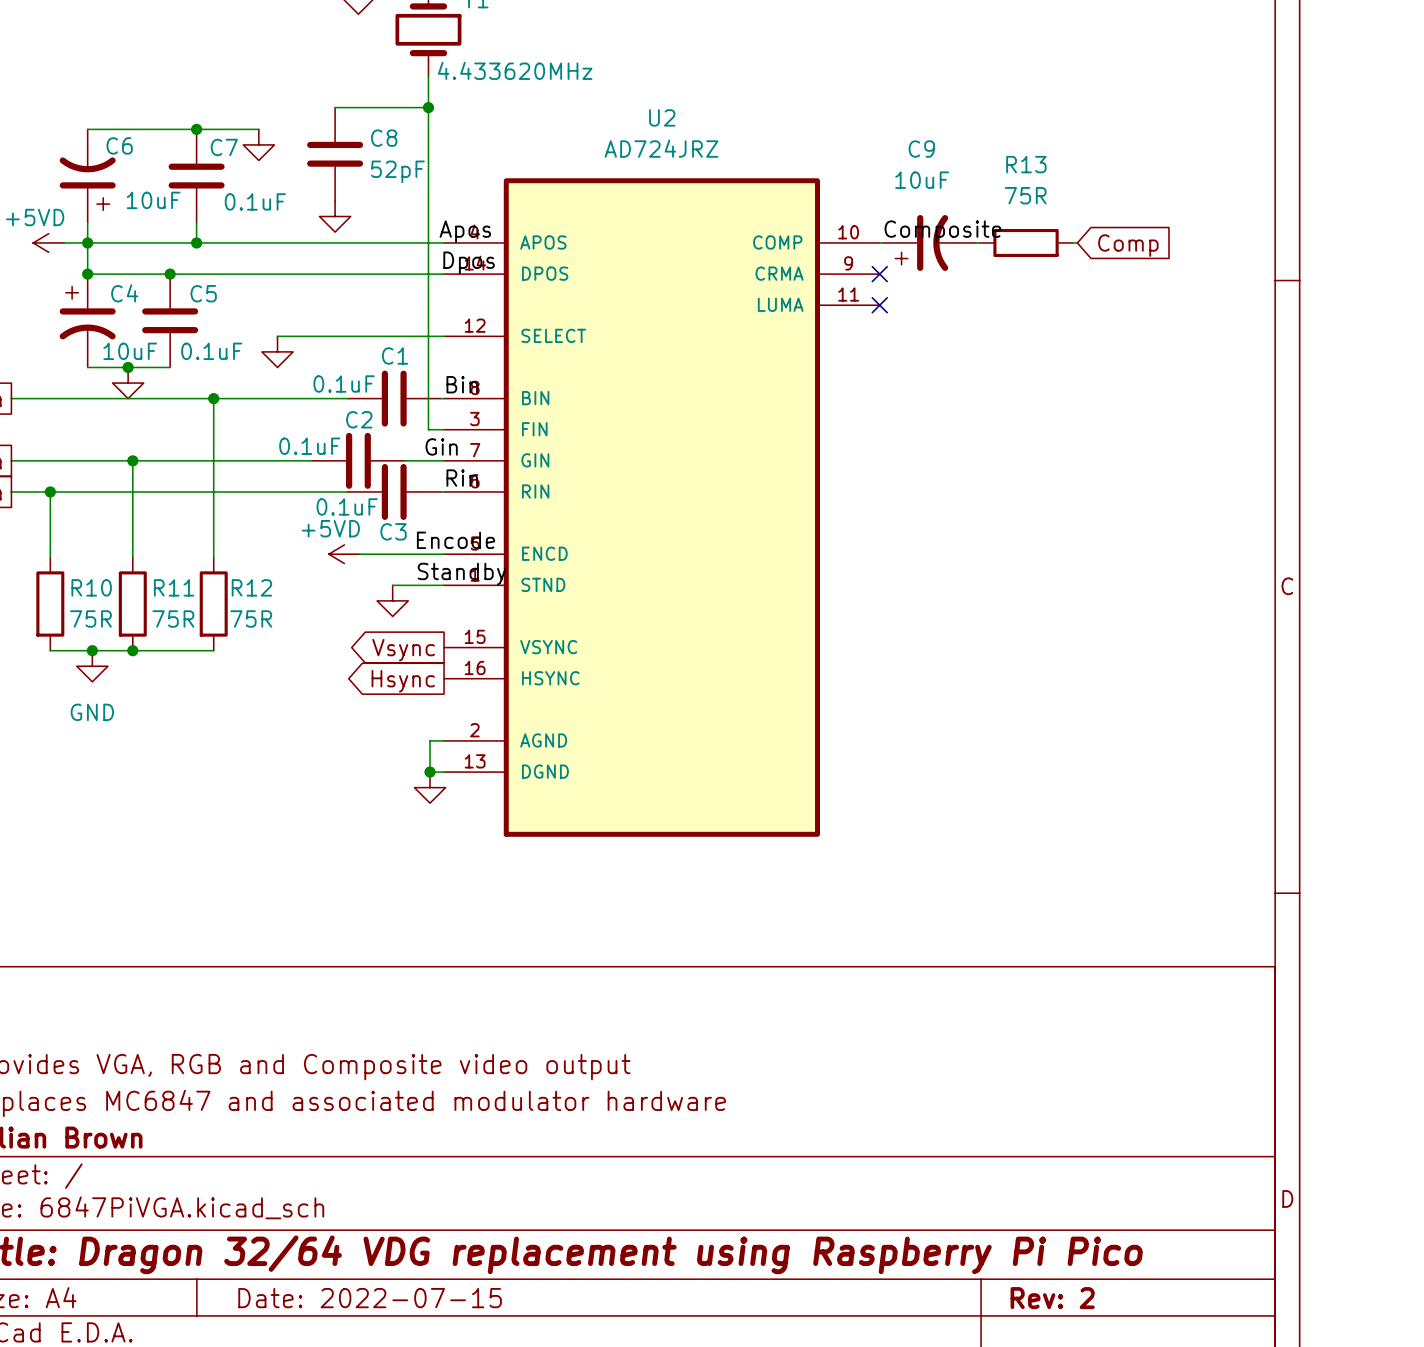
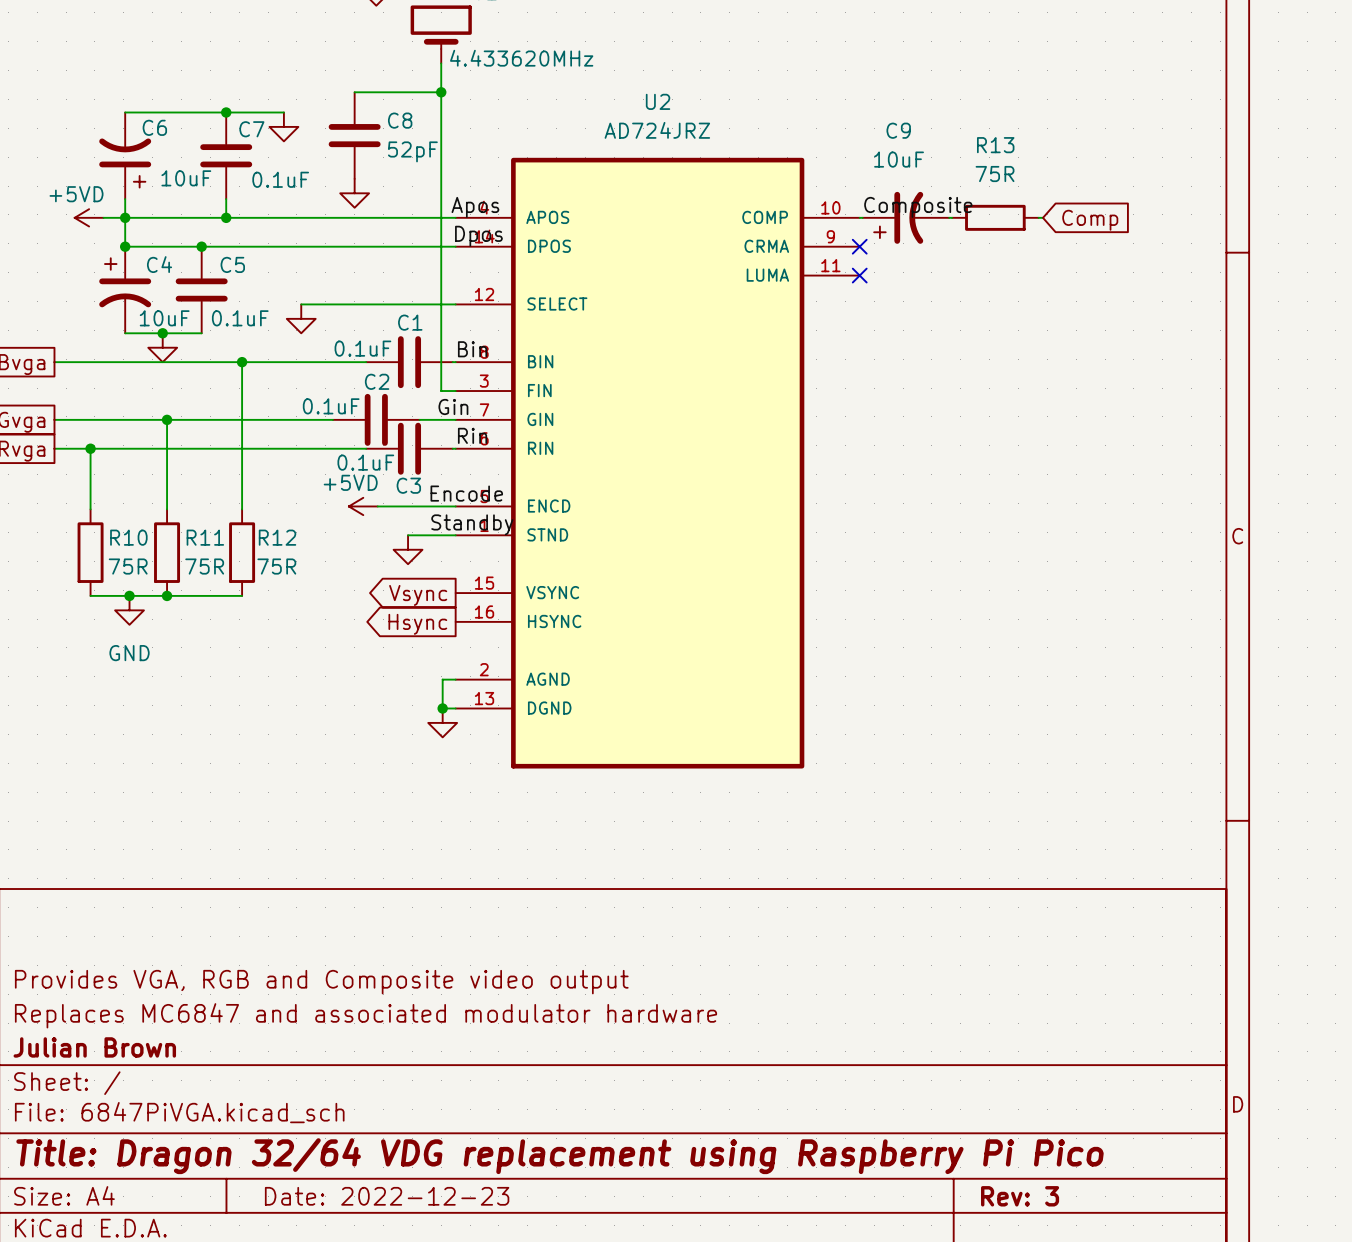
title block: Date: 2022-07-15 (370, 1298) -> Date: 2022-12-23 (387, 1196)
title block: Rev: 2 (1052, 1298) -> Rev: 3 (1020, 1196)

